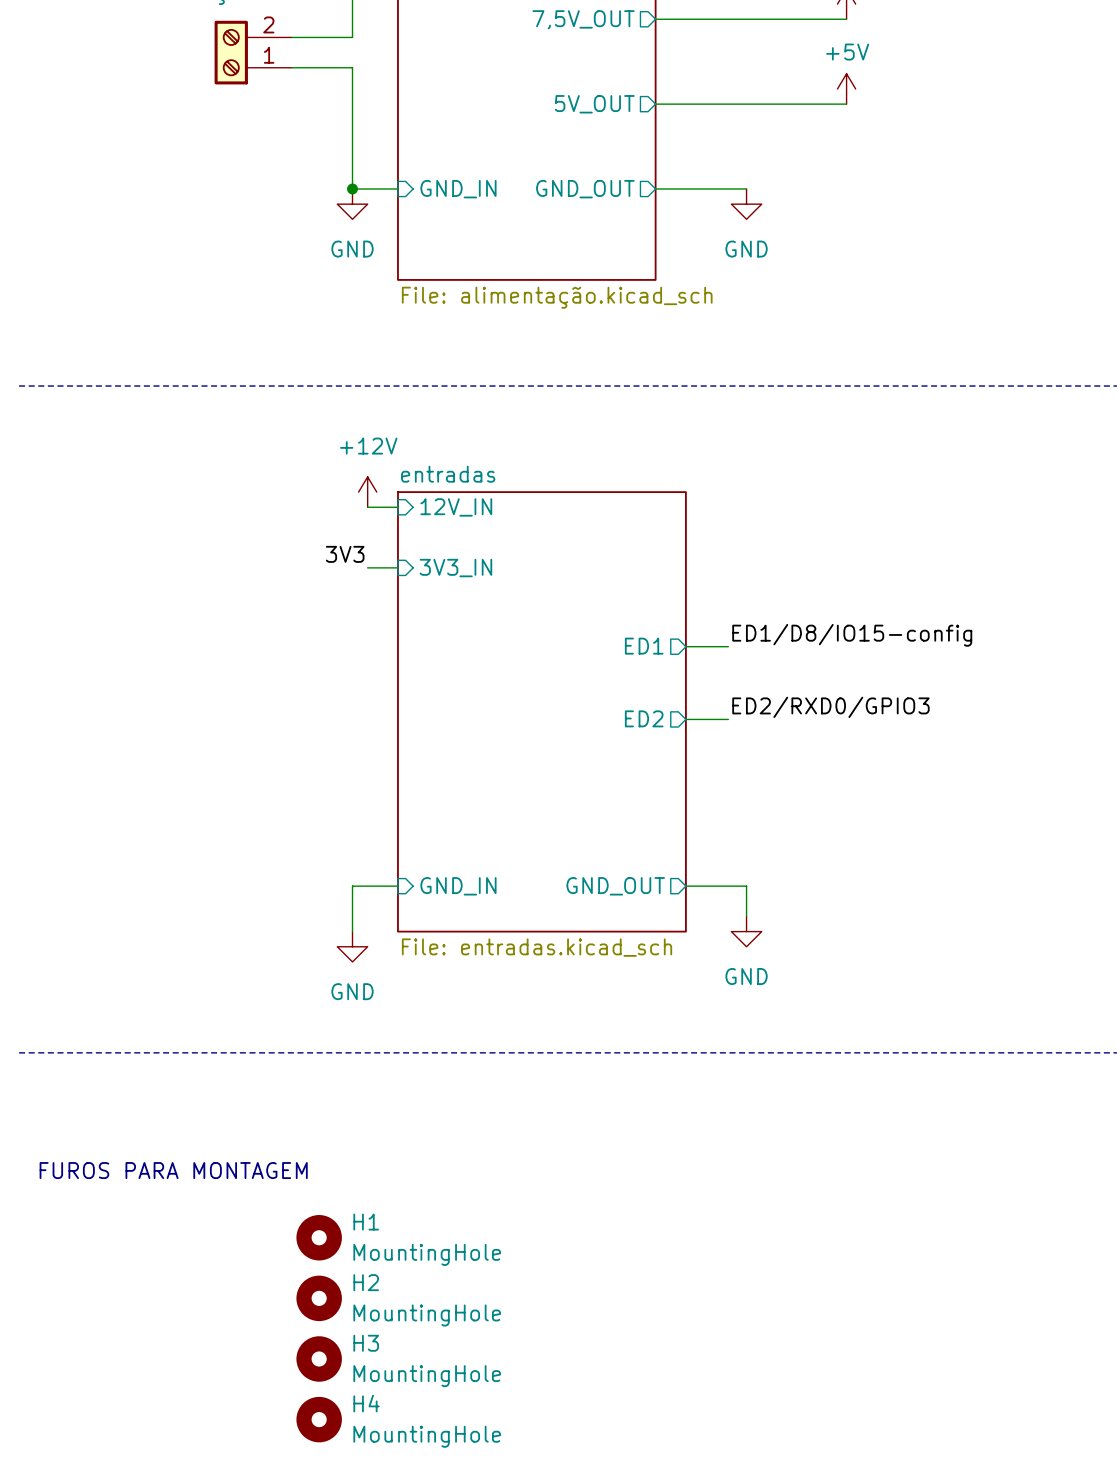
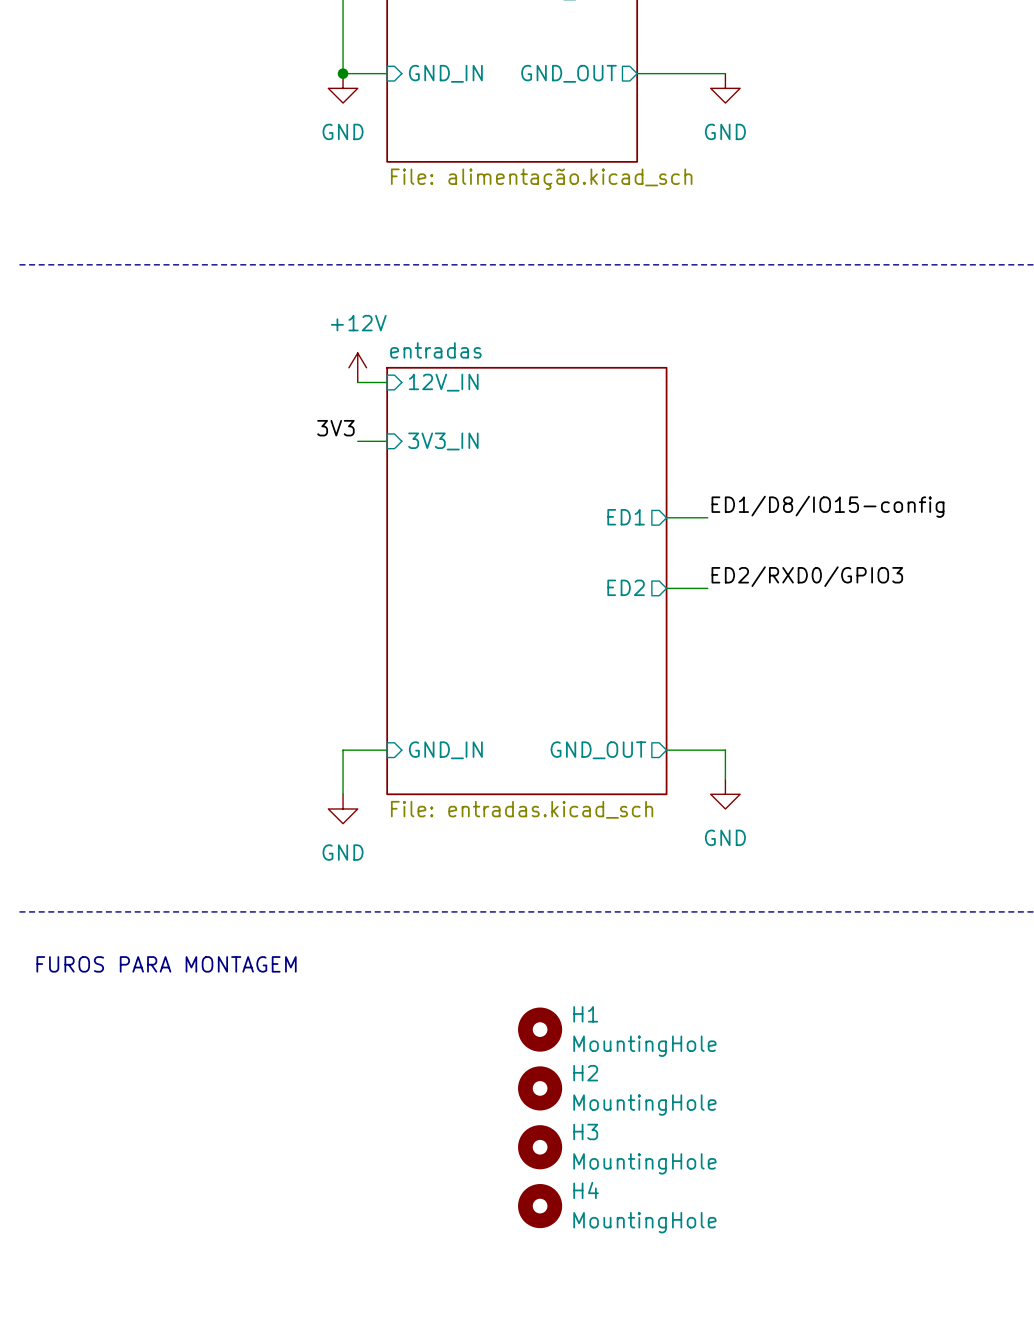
text position: FUROS PARA MONTAGEM (173, 1170) -> FUROS PARA MONTAGEM (166, 964)
H1 position: (319, 1237) -> (540, 1029)
H2 position: (319, 1298) -> (540, 1088)
H3 position: (319, 1358) -> (540, 1147)
H4 position: (319, 1419) -> (540, 1206)

